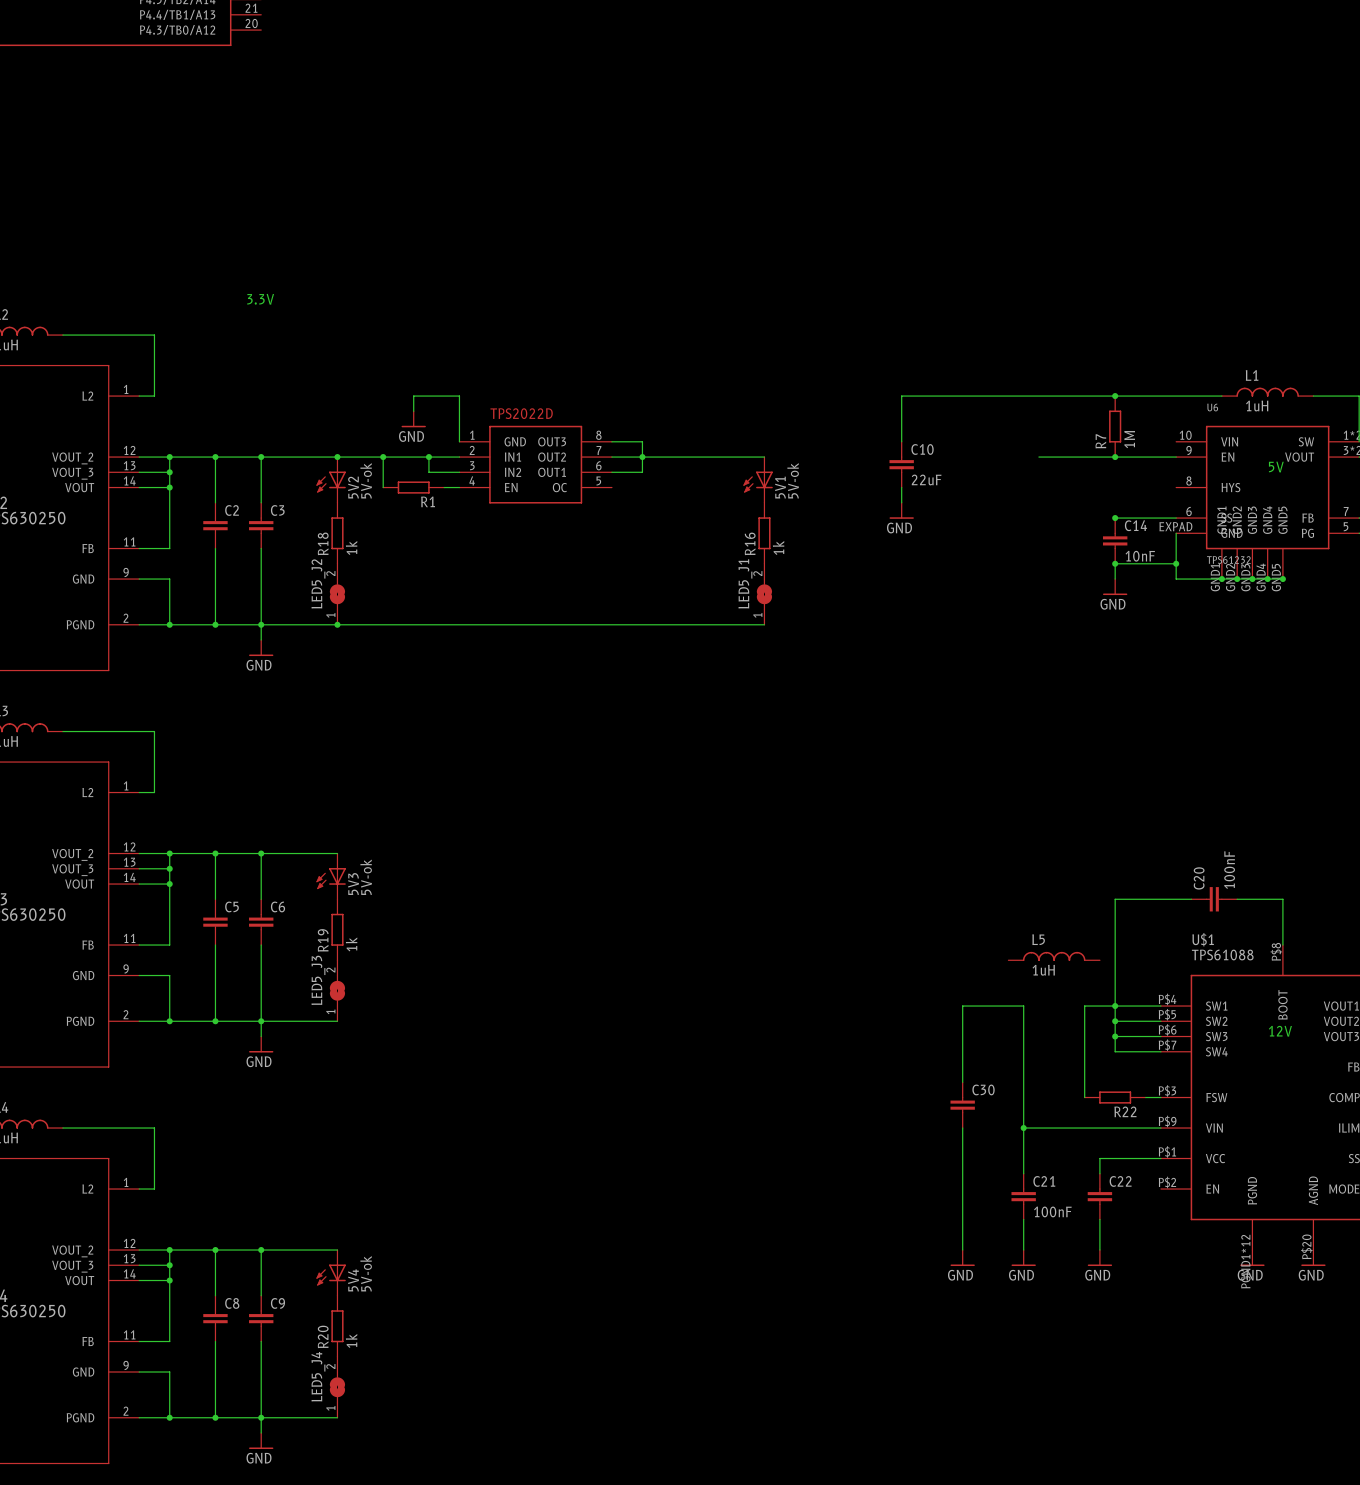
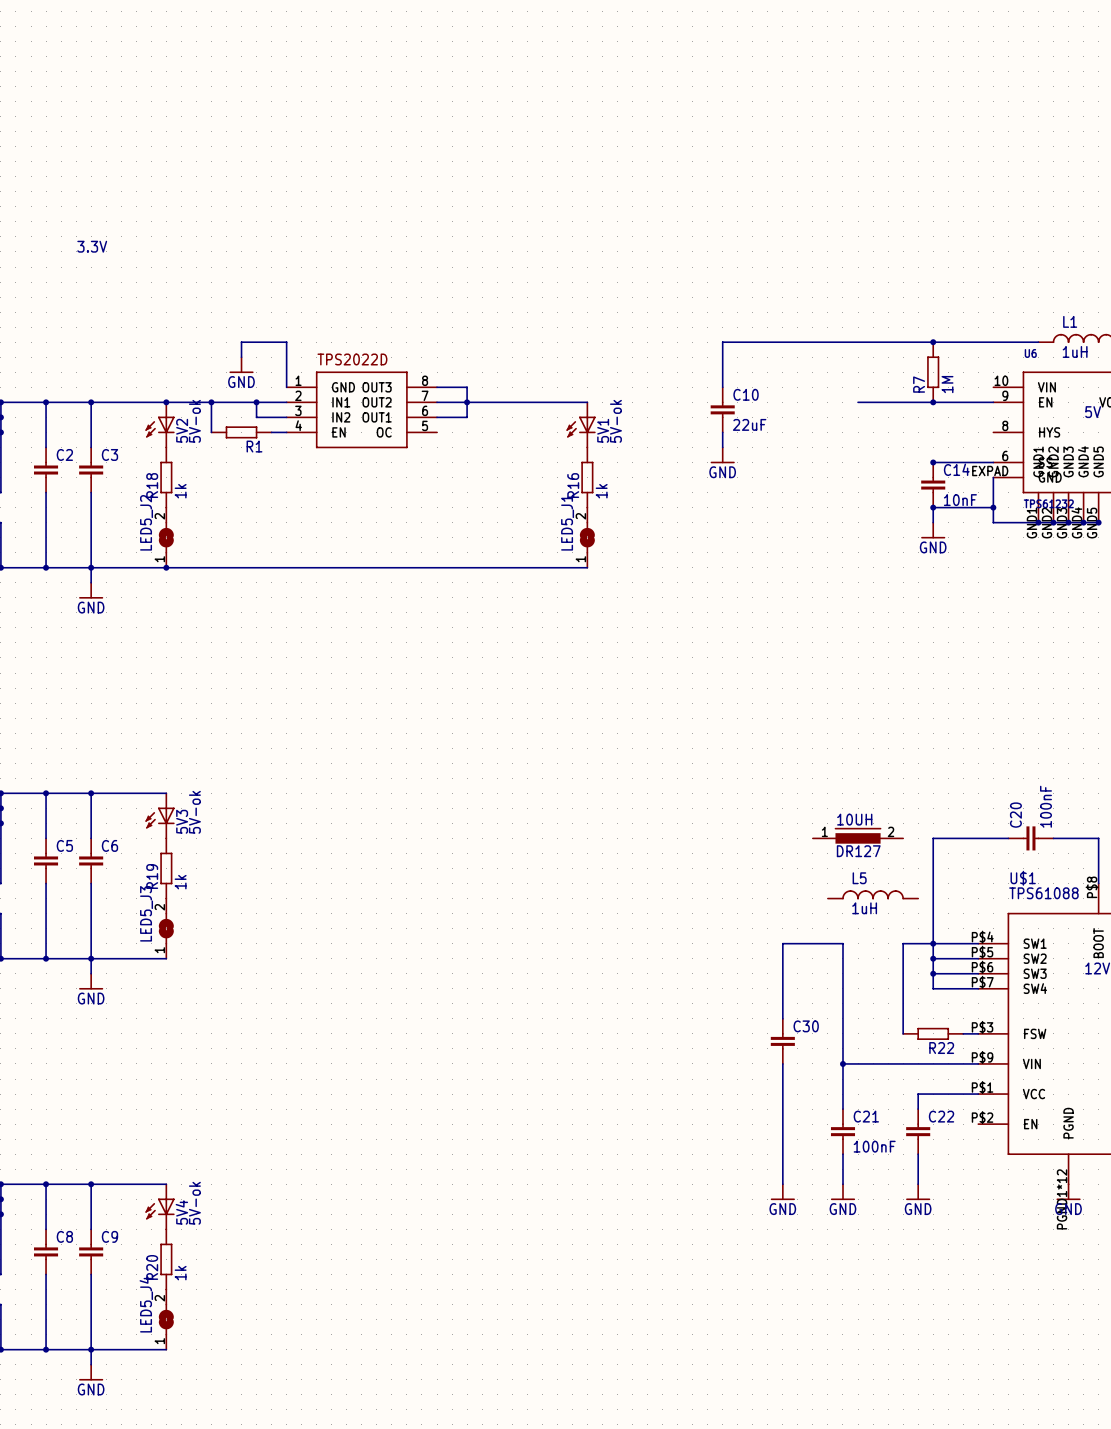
10UH: none -> DR127 (858, 835)

